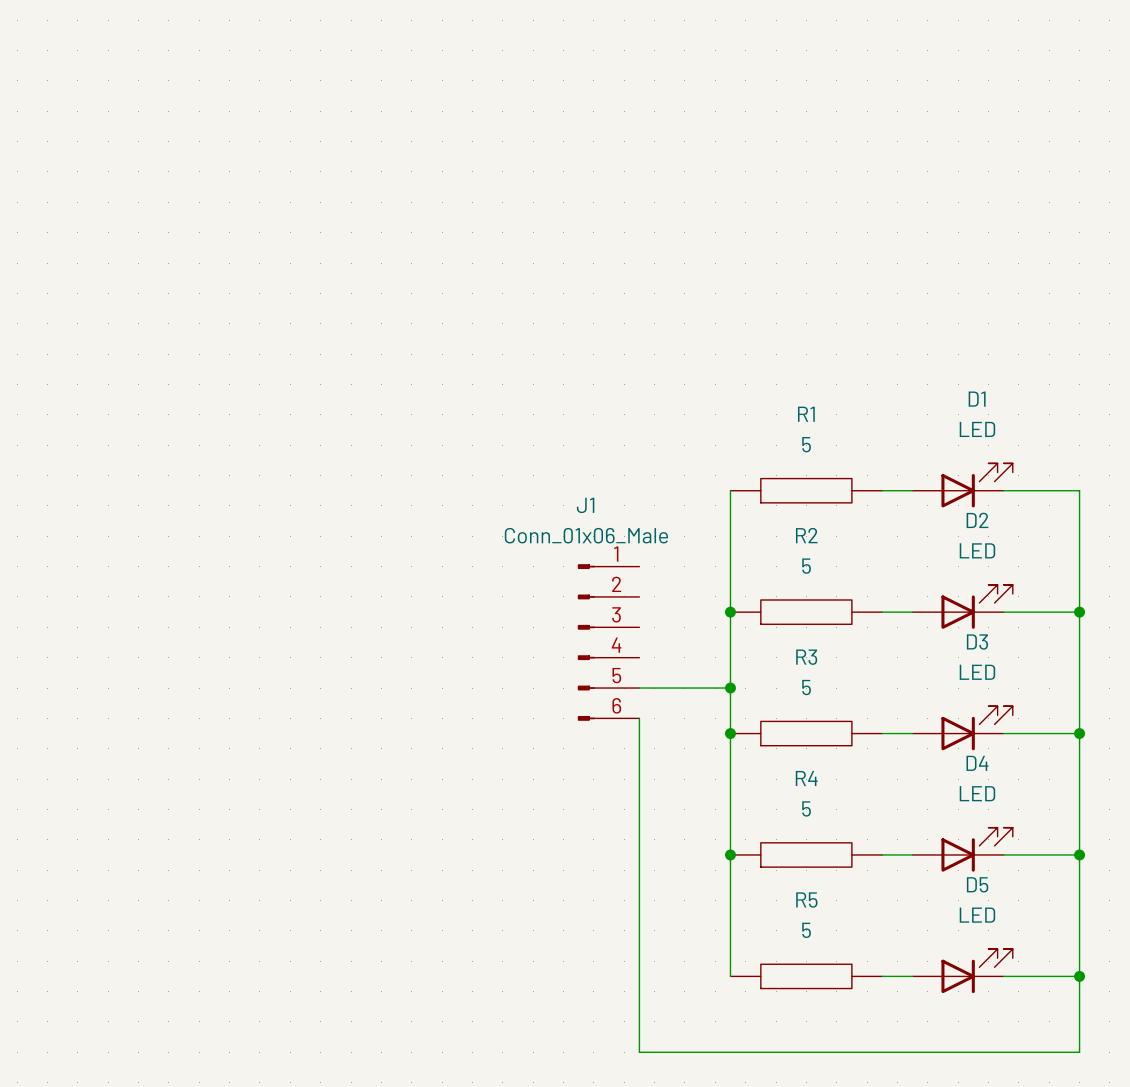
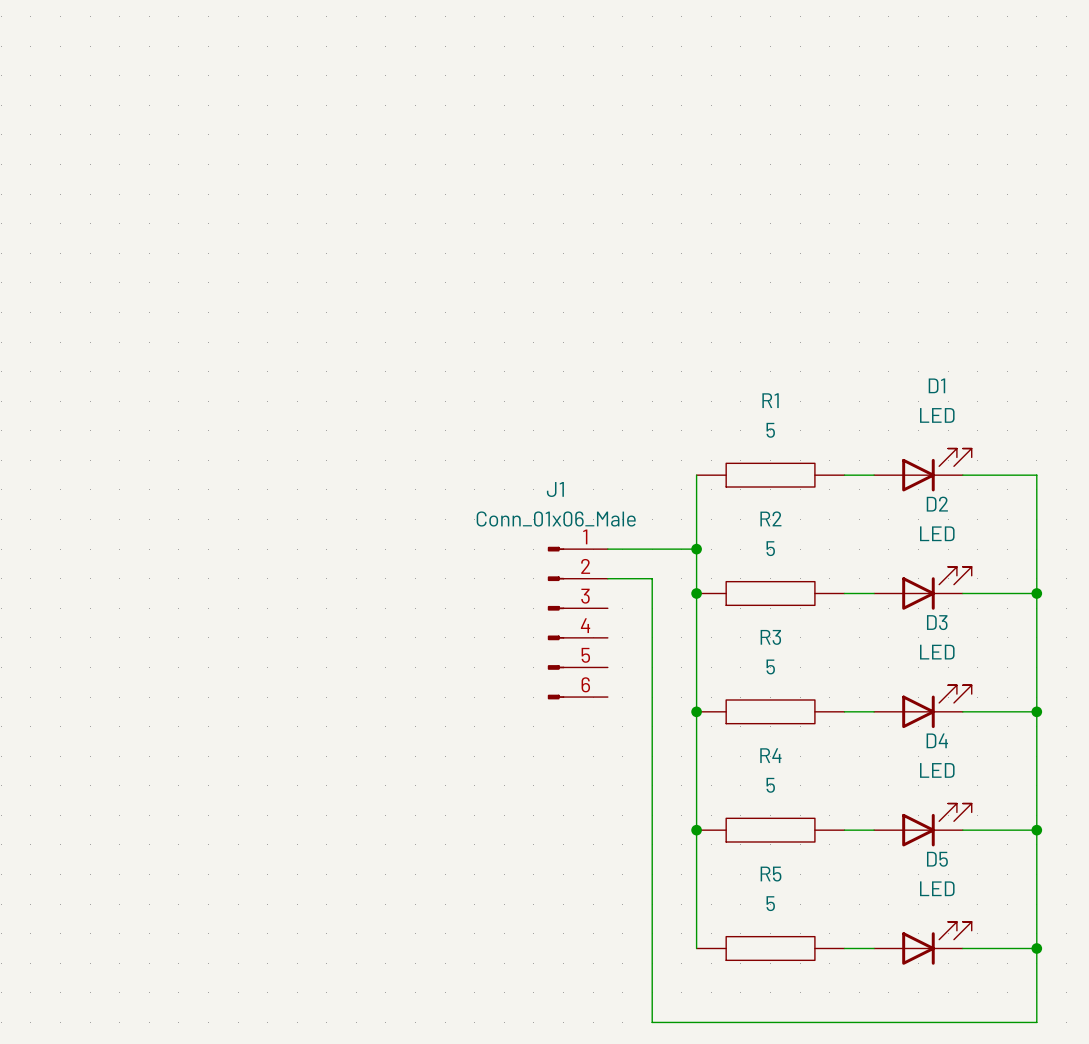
junction: none -> (696, 549)
wire: (639, 688) (730, 688) -> (607, 549) (696, 549)
junction: (730, 688) -> none
wire: (639, 718) (639, 1052) (684, 1052) -> (607, 578) (652, 578) (652, 1022)

